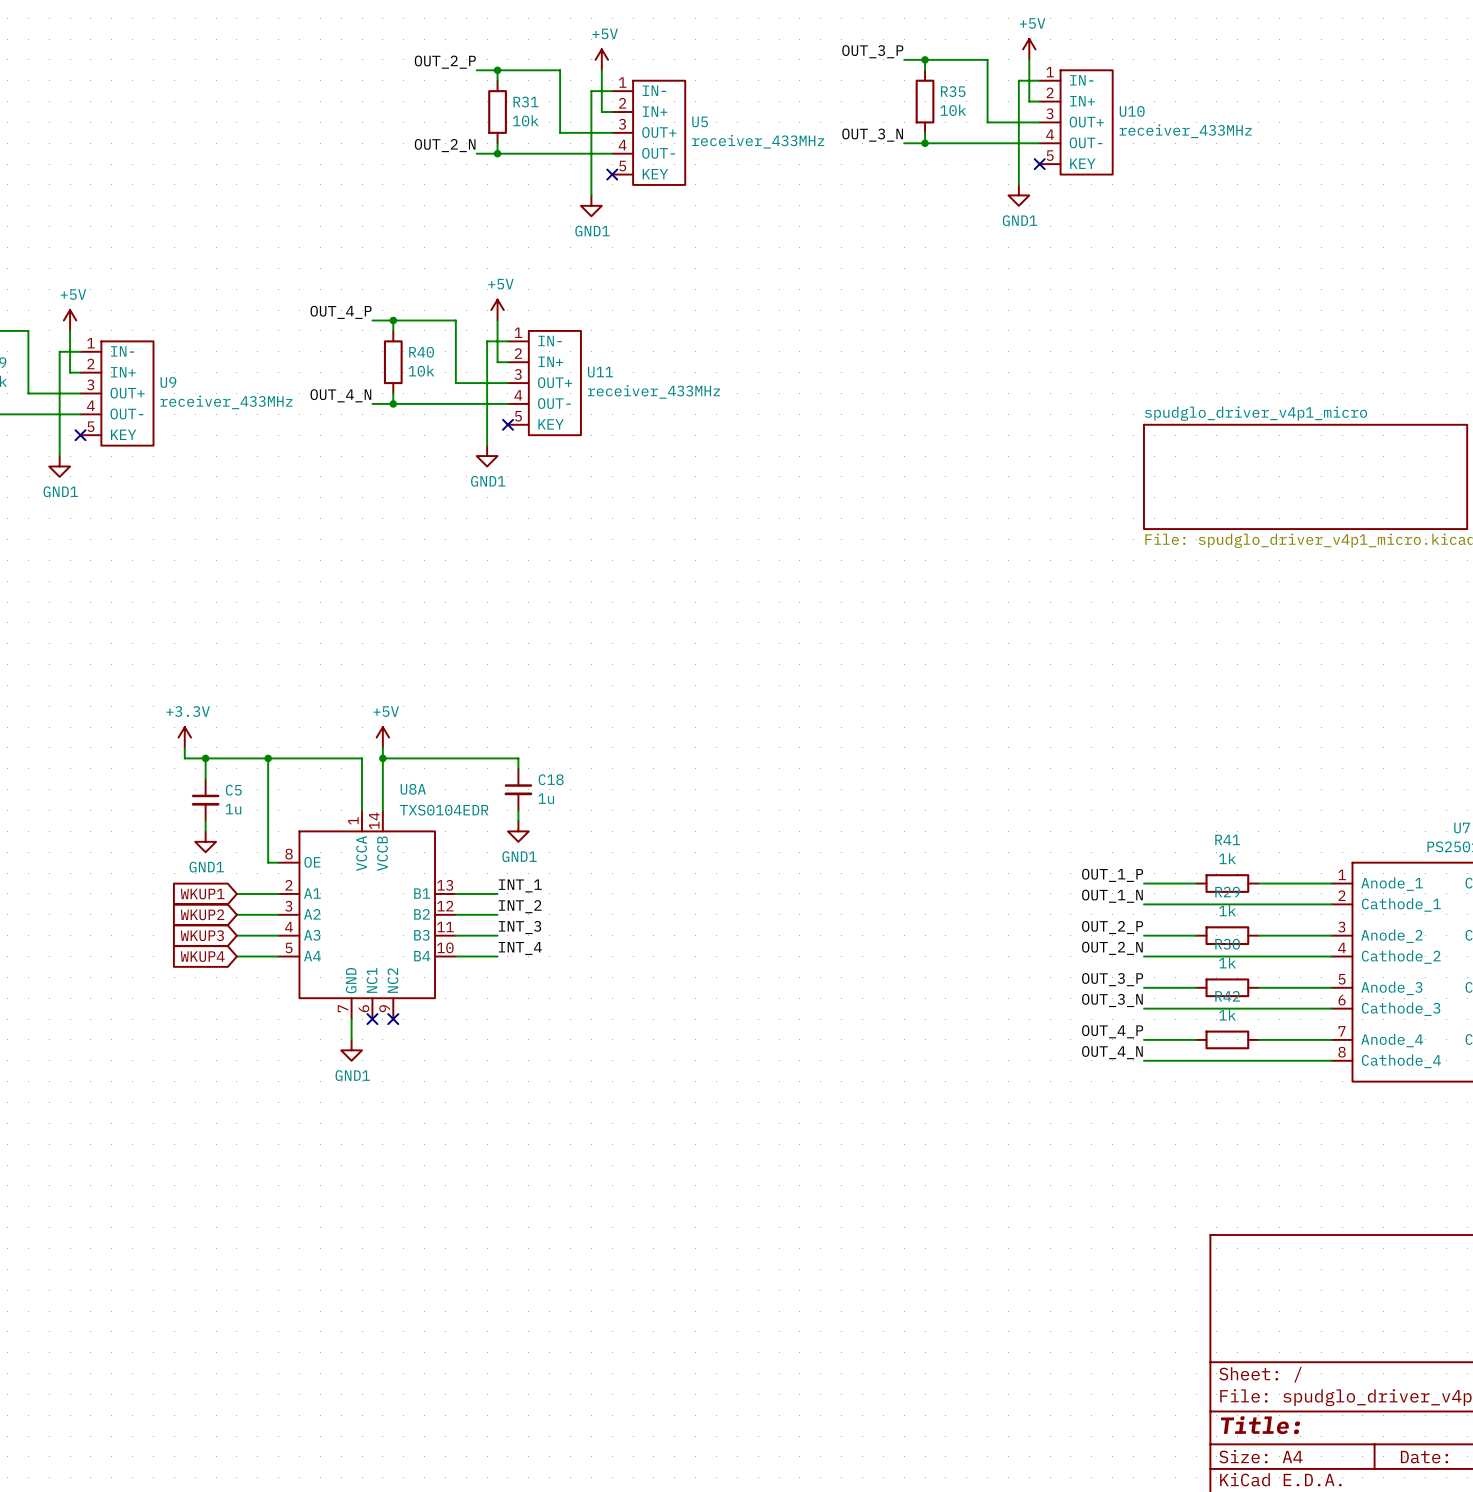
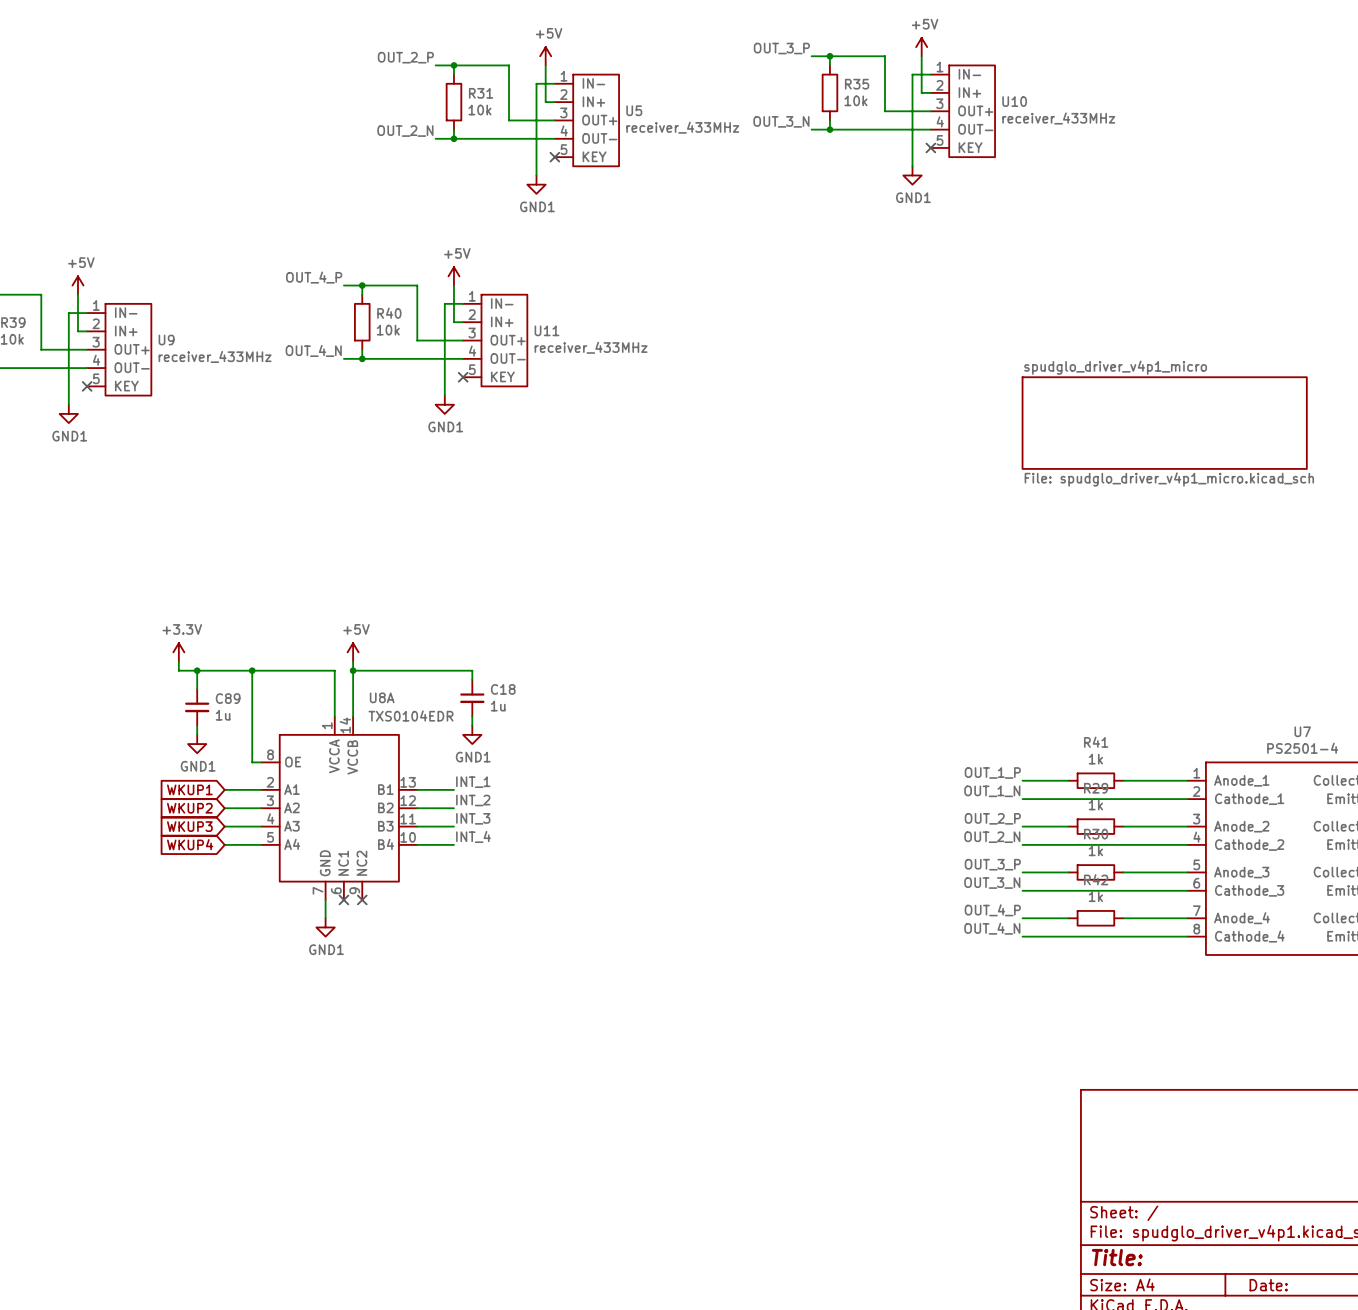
C5 name: C5 (233, 790) -> C89 (228, 698)

